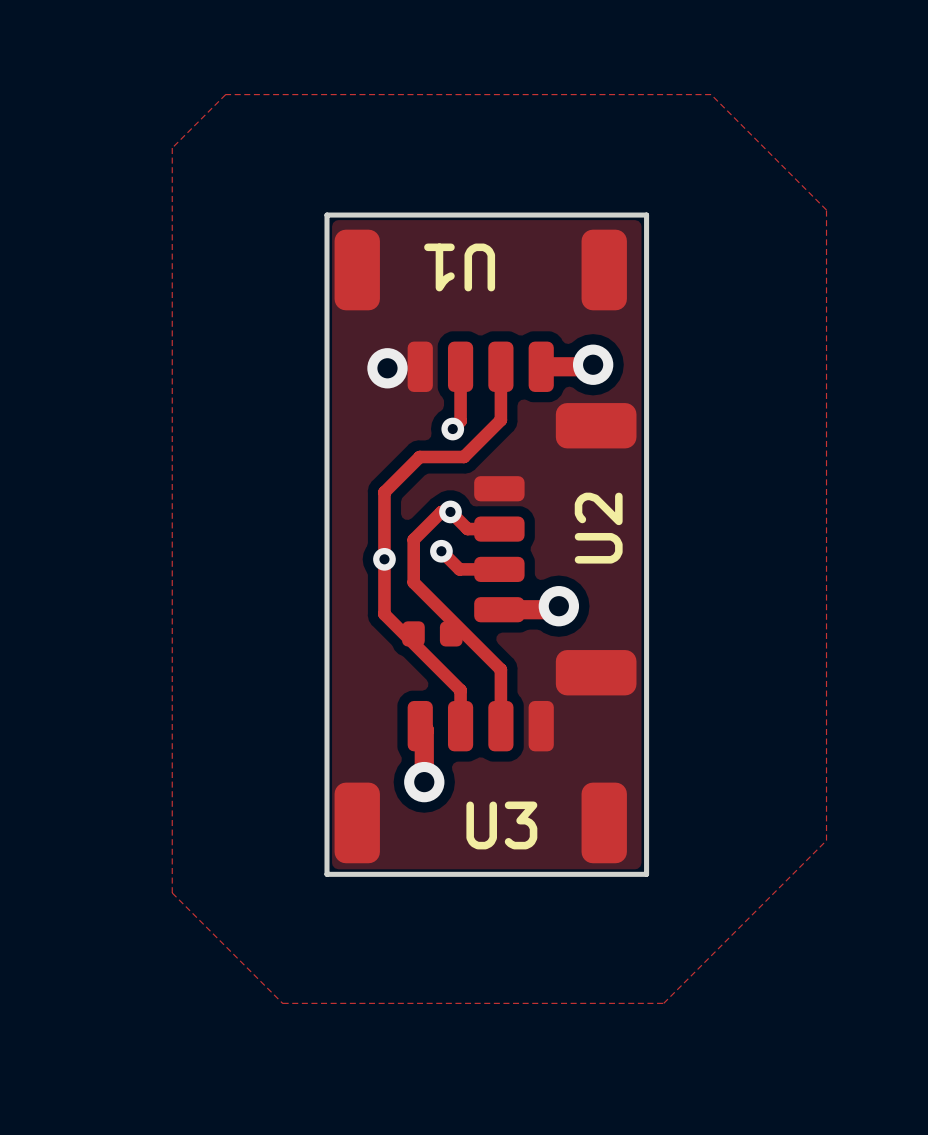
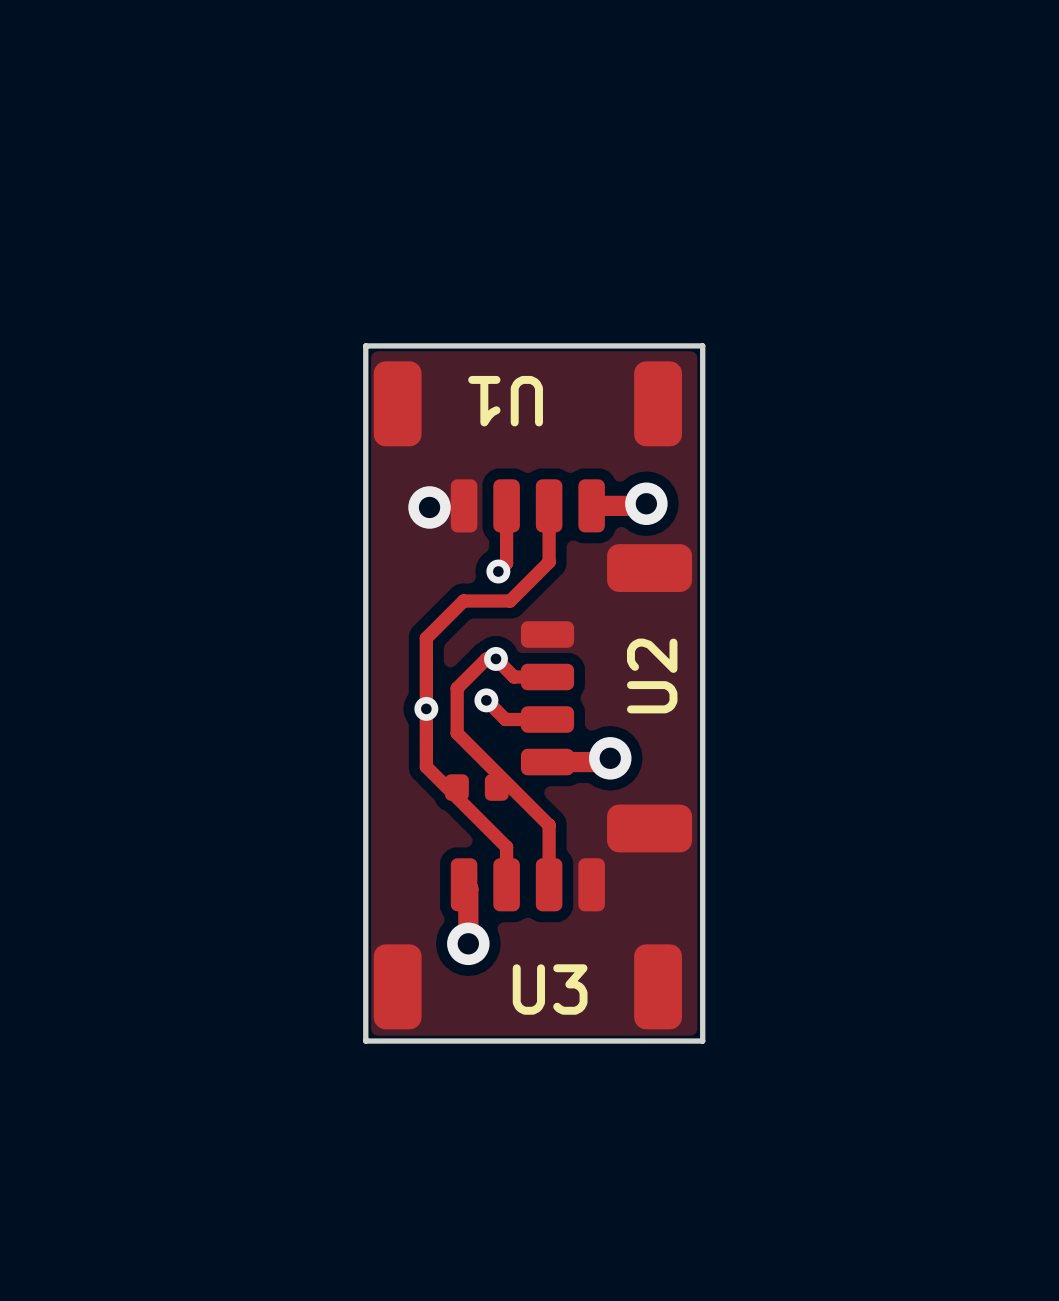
zone outline: (225, 94) (711, 94) (826, 210) (826, 840) (663, 1003) (282, 1003) (172, 892) (172, 148) (225, 94) -> none

